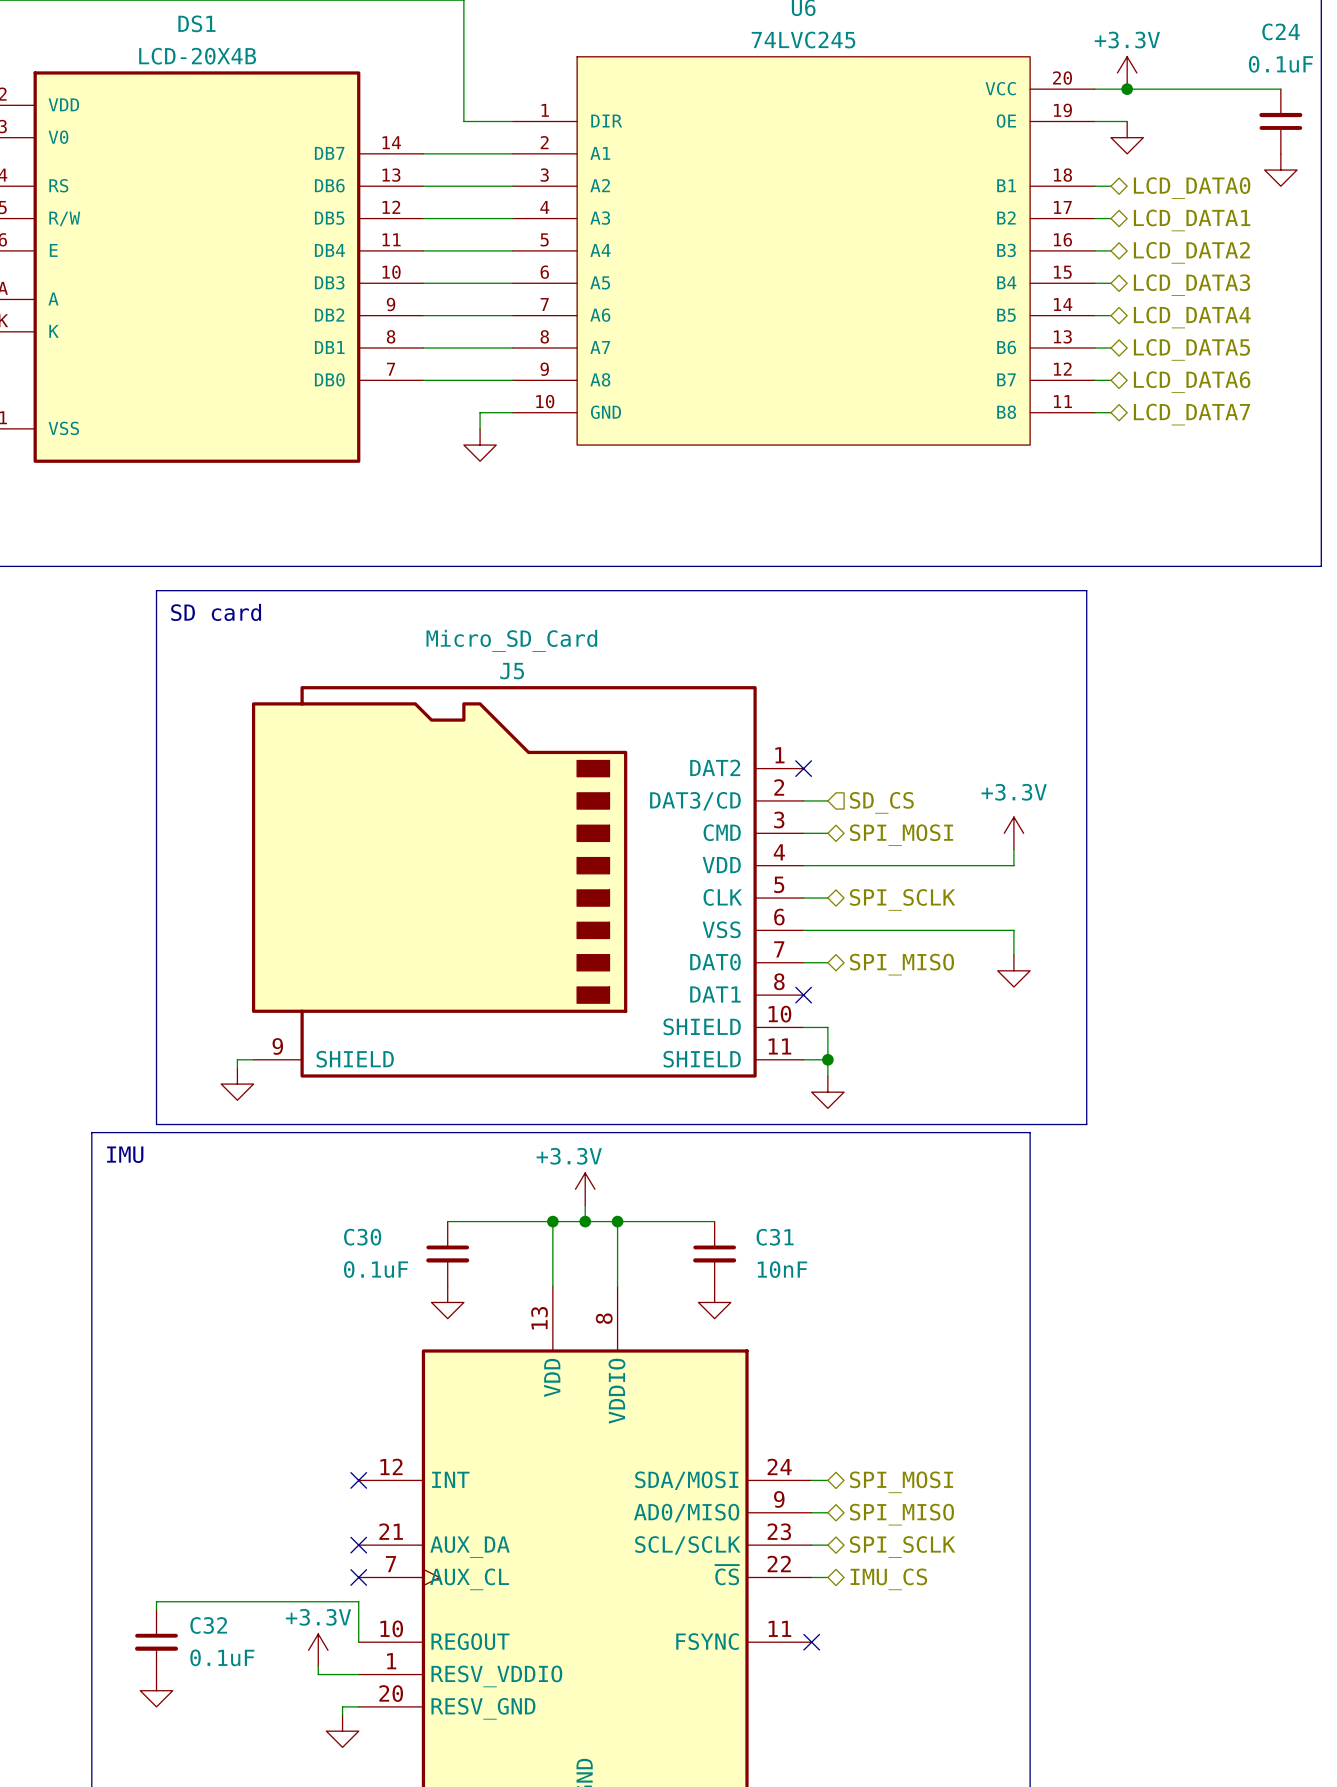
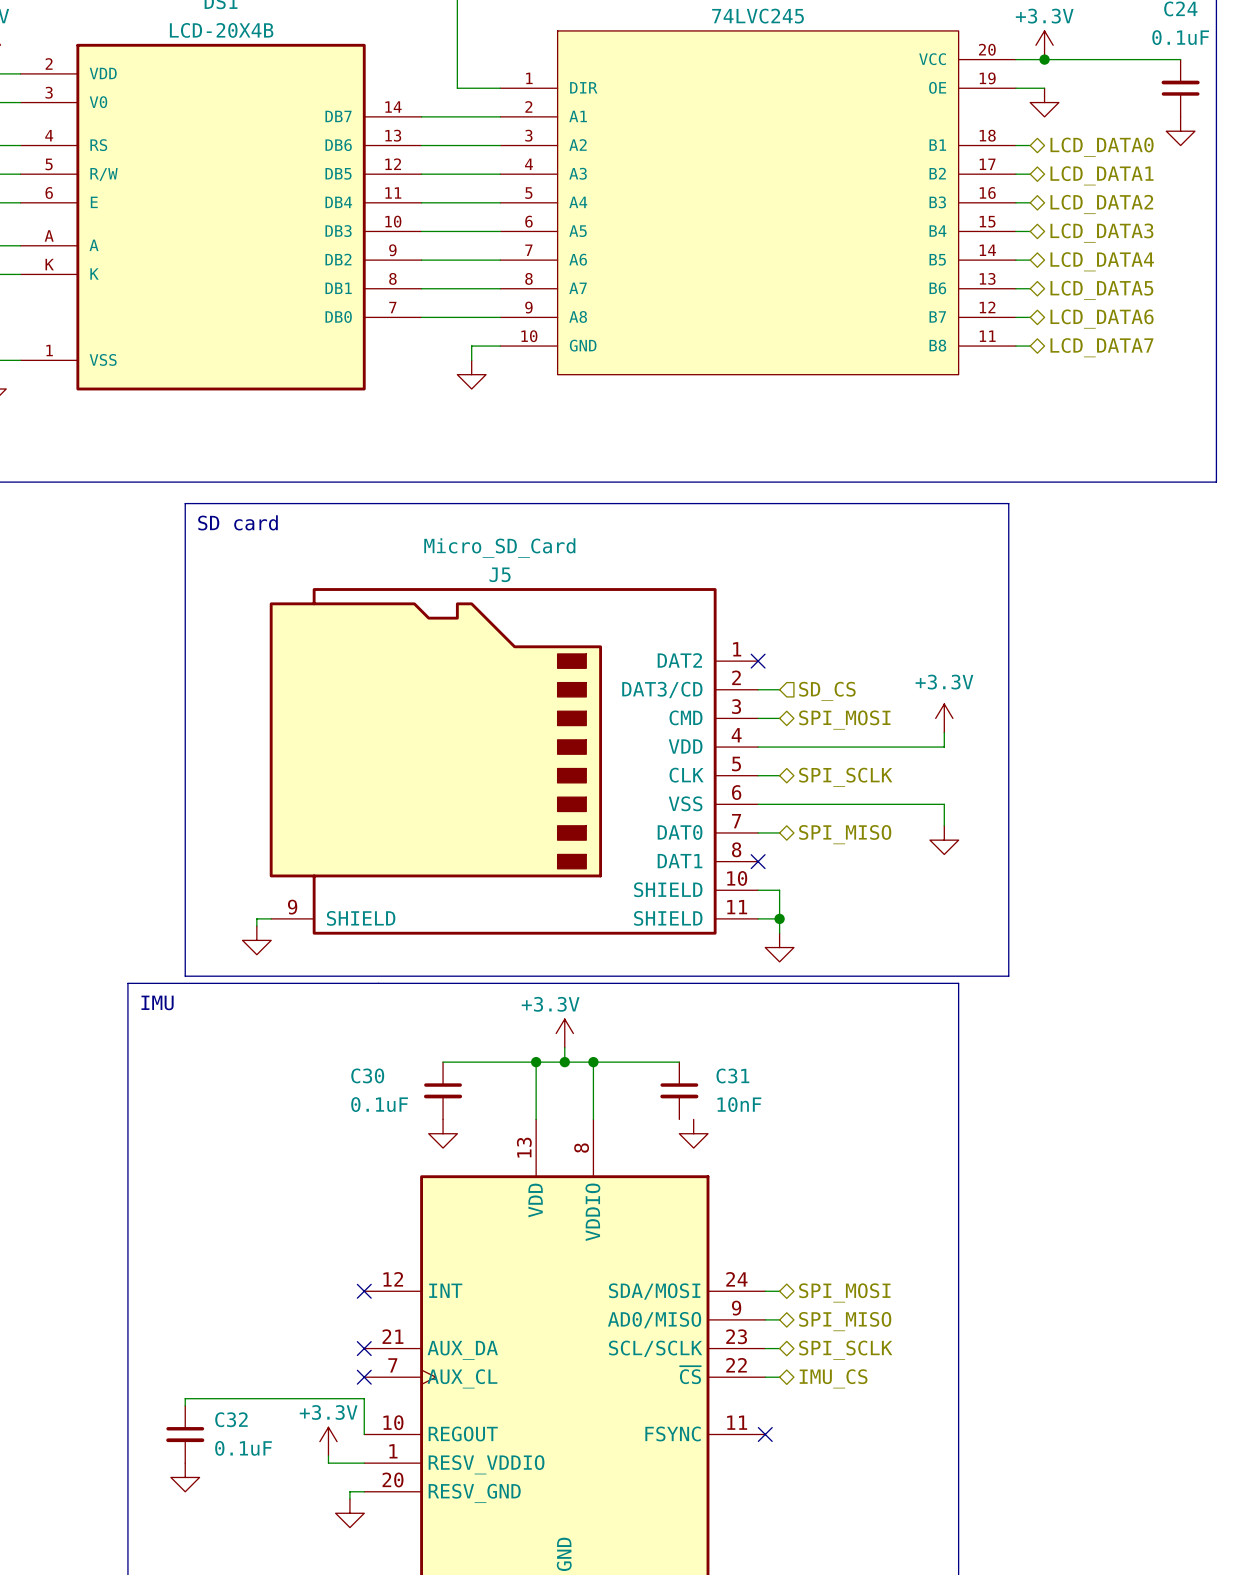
power symbol position: (714, 1302) -> (693, 1133)

